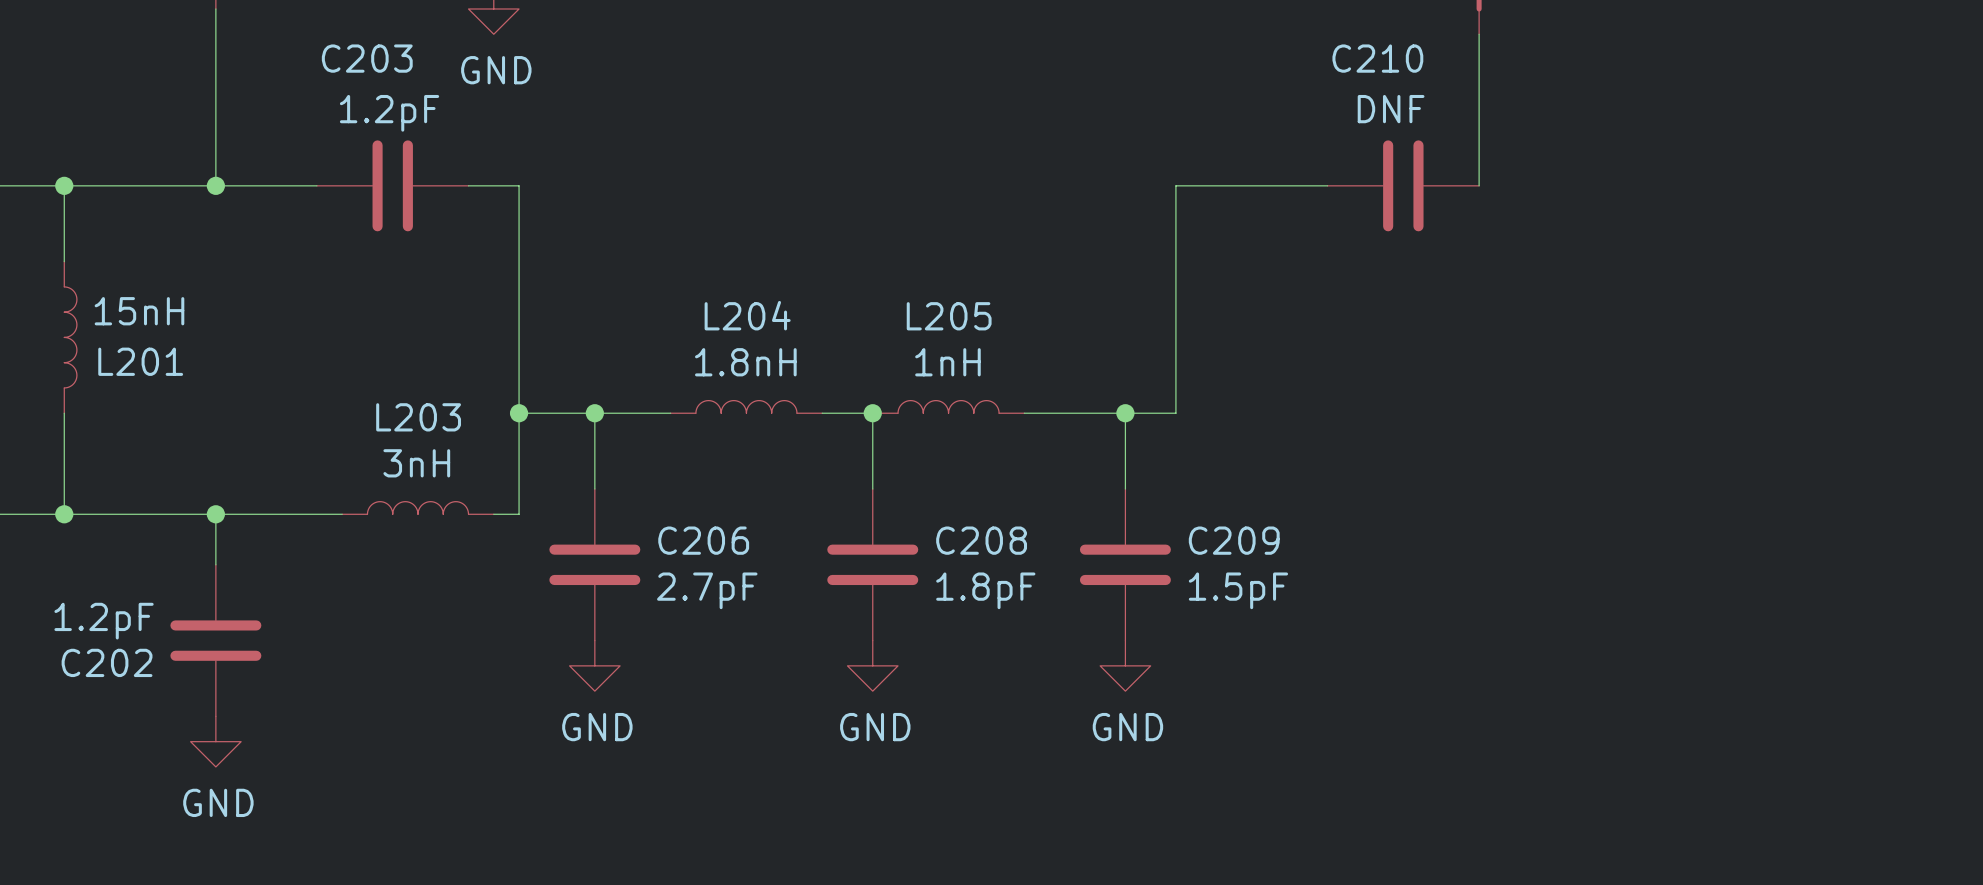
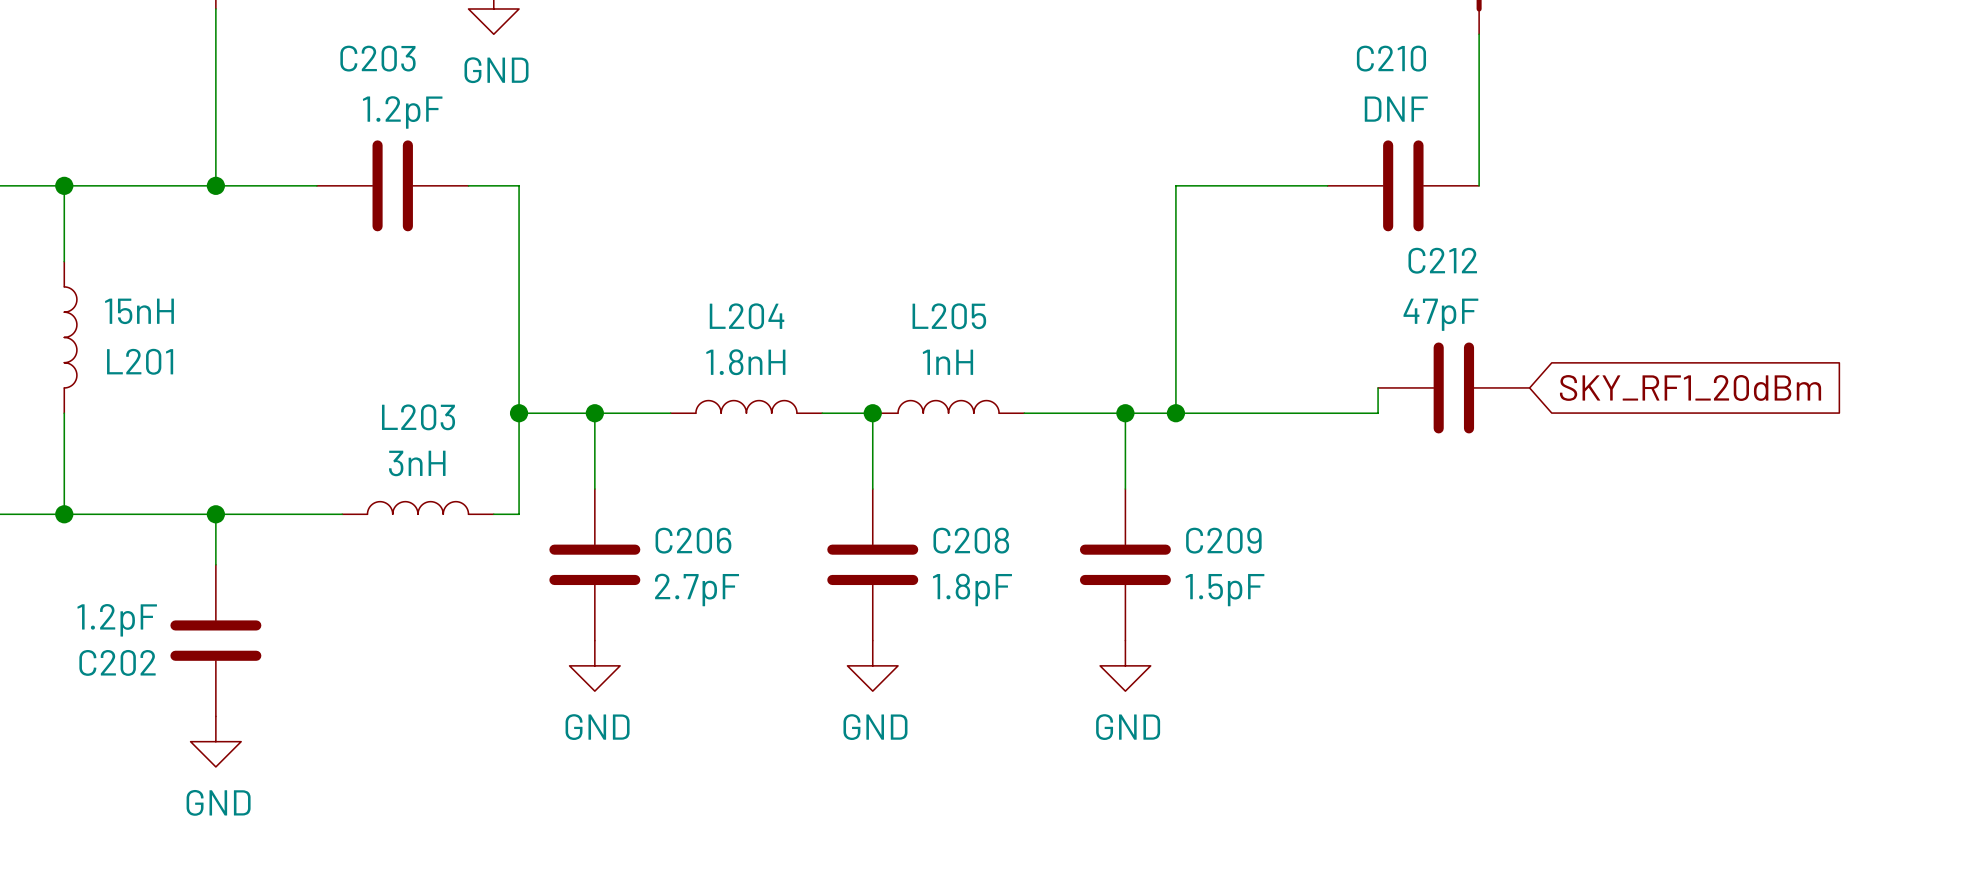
wire: none -> (1378, 387) (1378, 413) (1175, 413)
C212: none -> 47pF (1453, 387)
global label: none -> SKY_RF1_20dBm (1690, 387)
junction: none -> (1175, 413)

